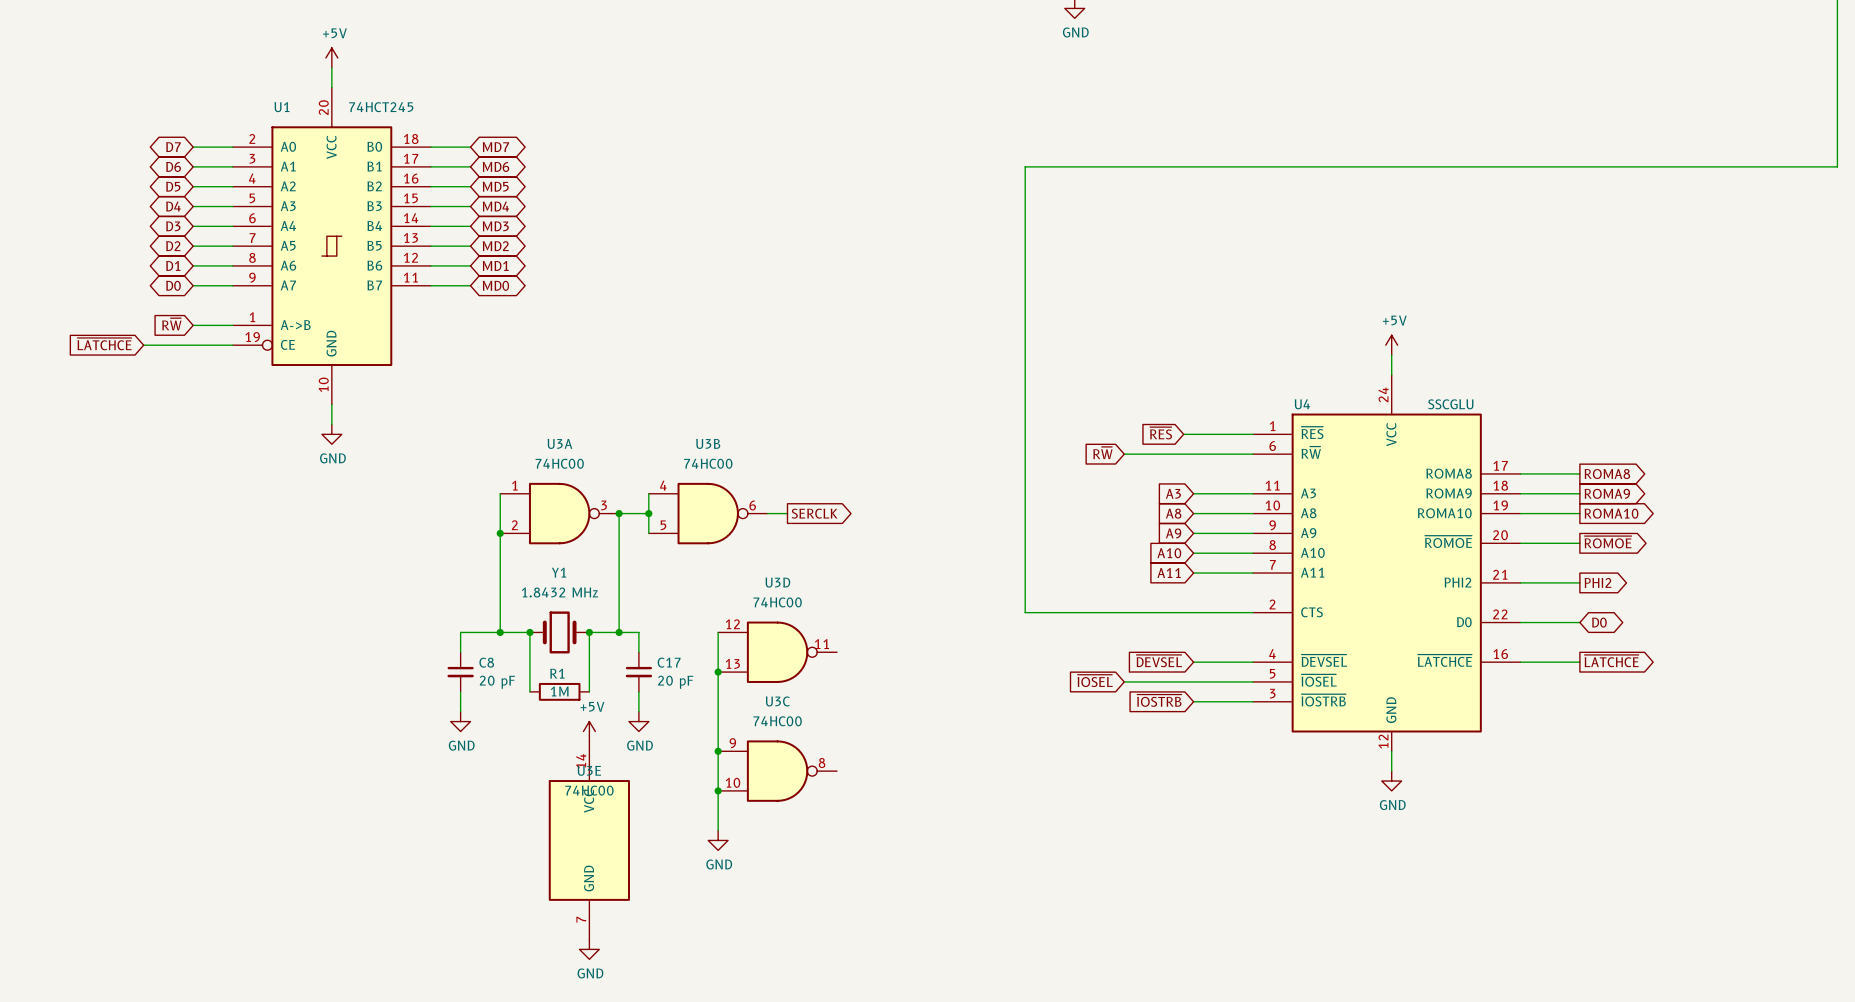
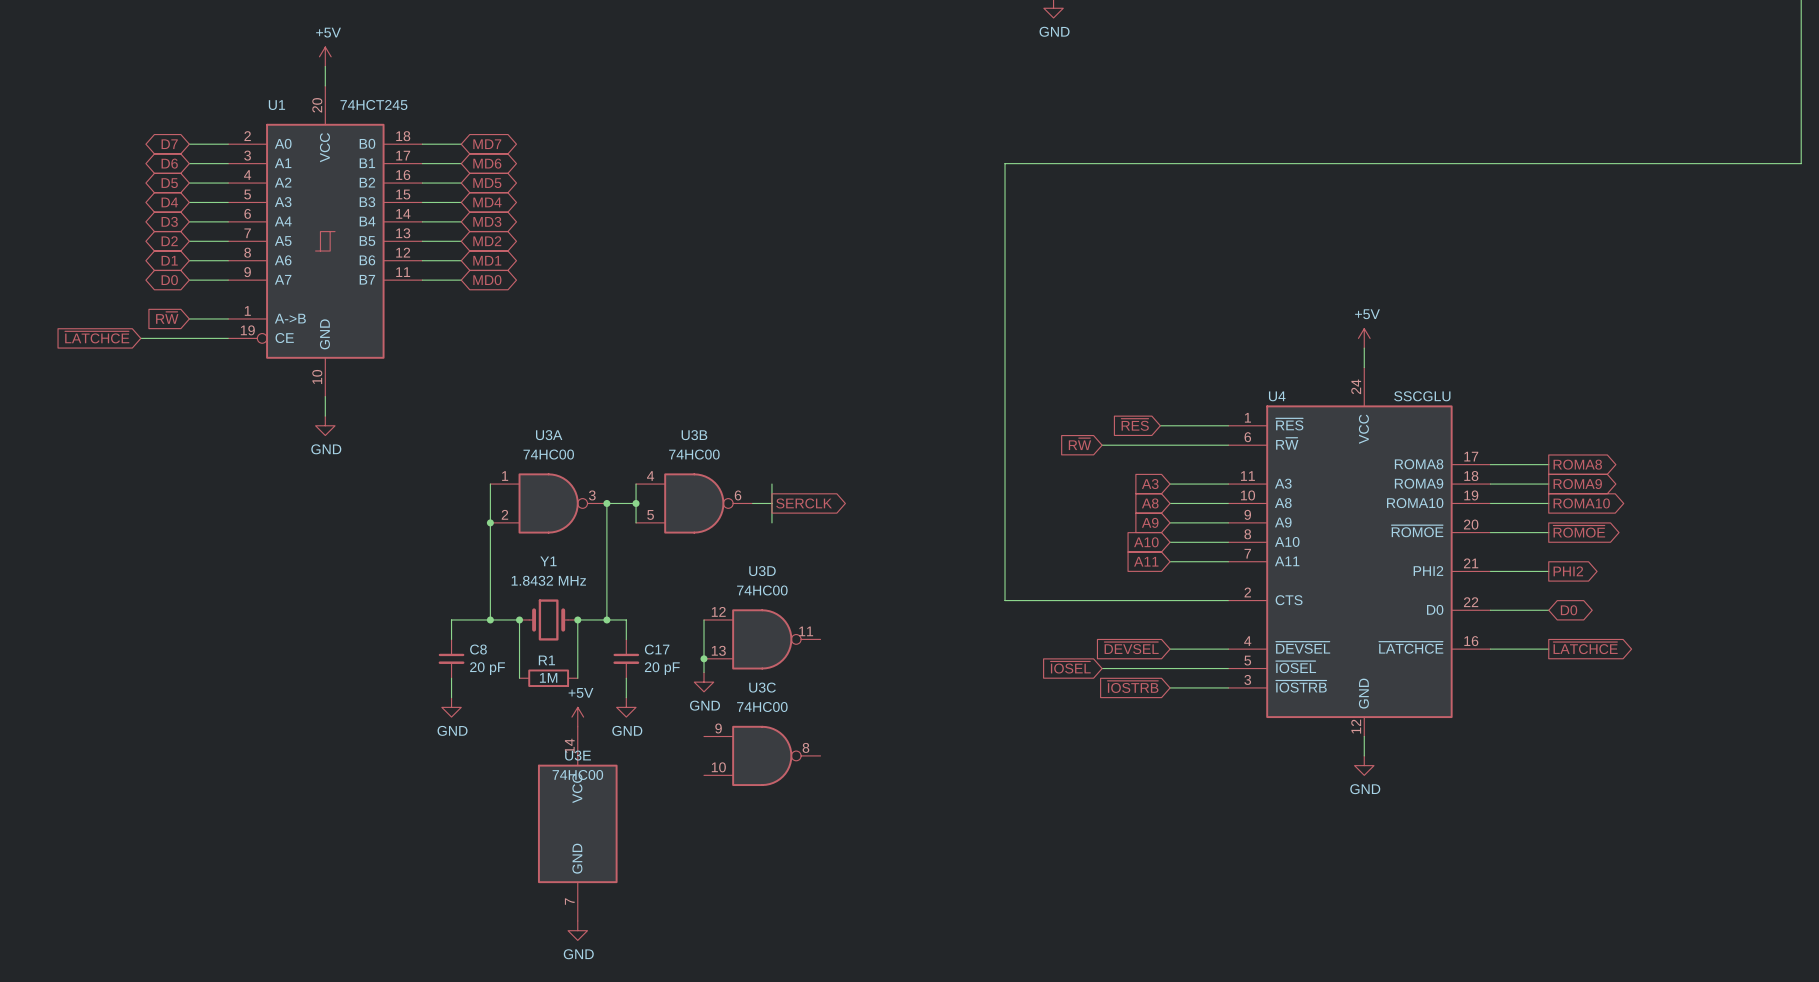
wire: none -> (771, 484) (771, 522)
wire: (718, 685) (718, 830) -> none
junction: (718, 751) -> none
junction: (718, 790) -> none
power symbol position: GND (718, 840) -> GND (704, 682)

